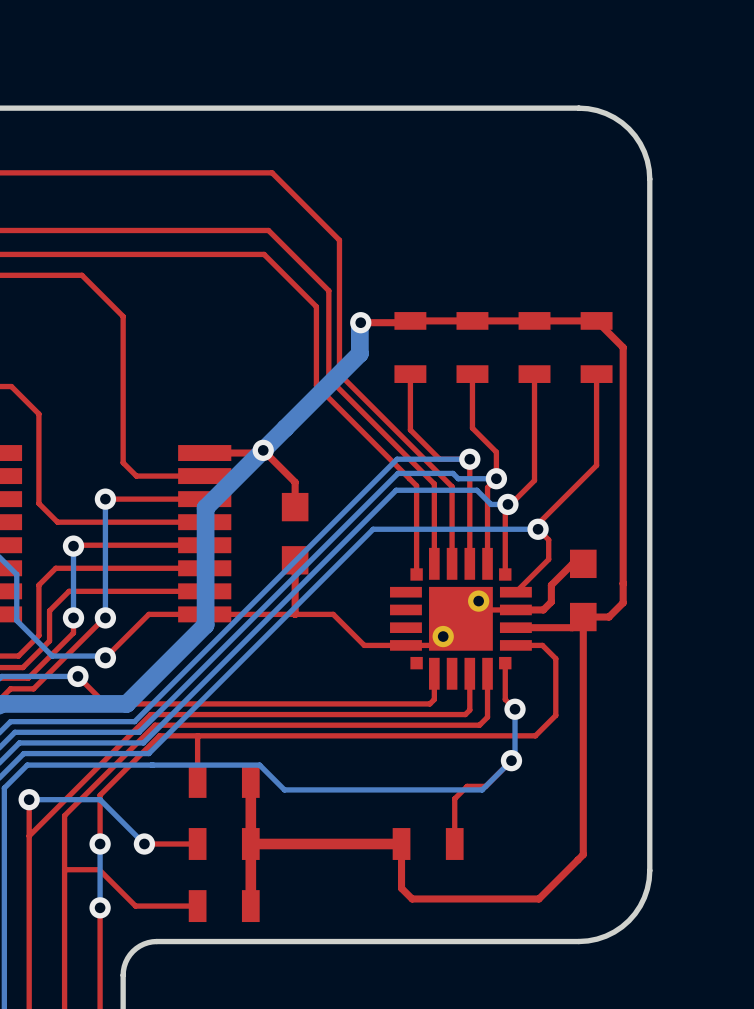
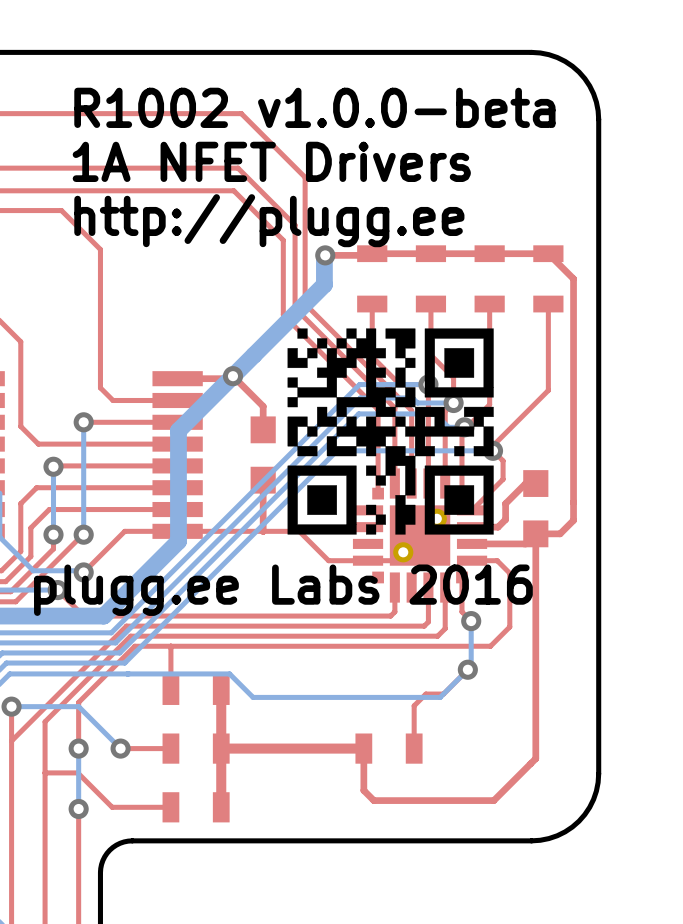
text: none -> R1002 v1.0.0-beta (314, 107)
text: none -> 1A NFET Drivers (271, 161)
text: none -> http://plugg.ee (269, 220)
drawing: none -> [287, 328, 494, 535]
text: none -> plugg.ee Labs 2016 (283, 590)

